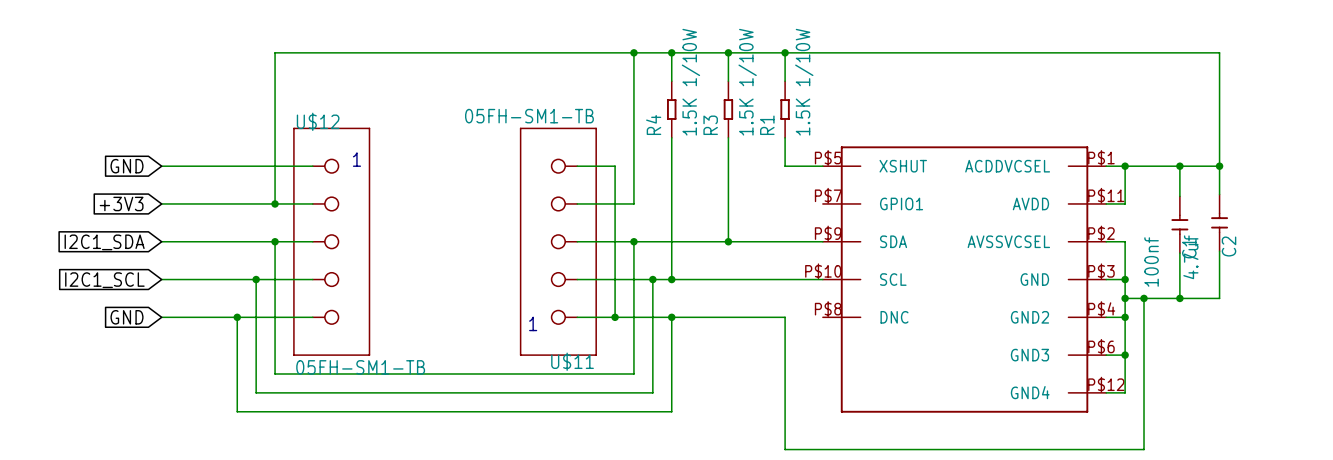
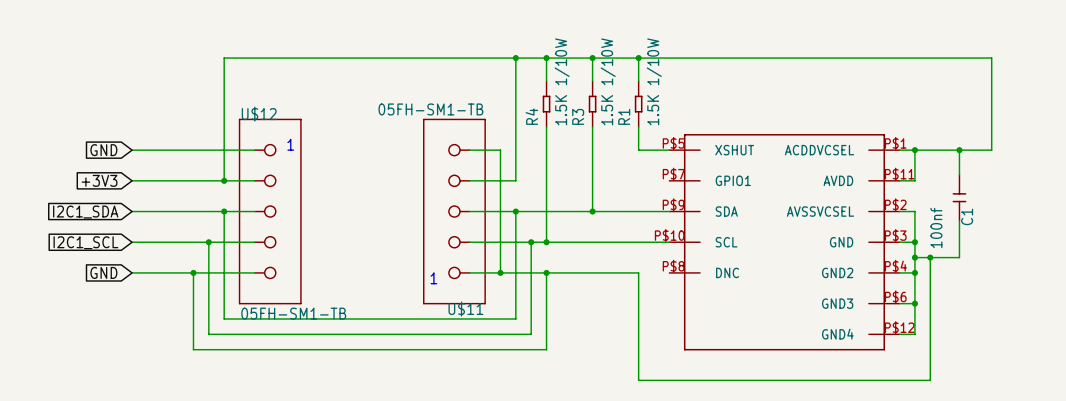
wire: (1219, 166) (1219, 194) -> none
junction: (1219, 166) -> none
C2: 4.7uf (1219, 222) -> none
wire: (1219, 251) (1219, 298) (1179, 298) -> none
junction: (1179, 298) -> none

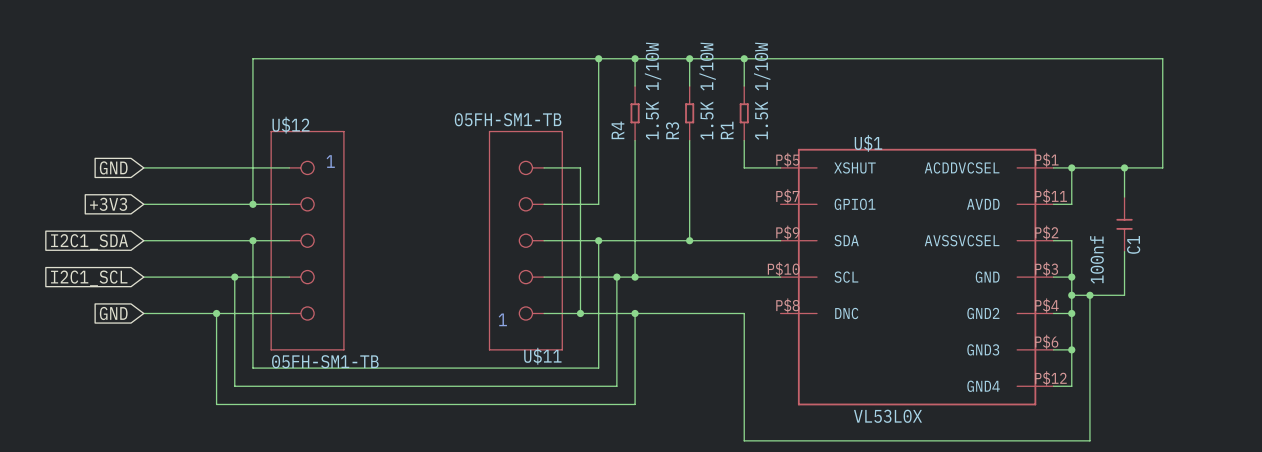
U$1 name: none -> U$1 (868, 143)
U$1 value: none -> VL53L0X (887, 416)

